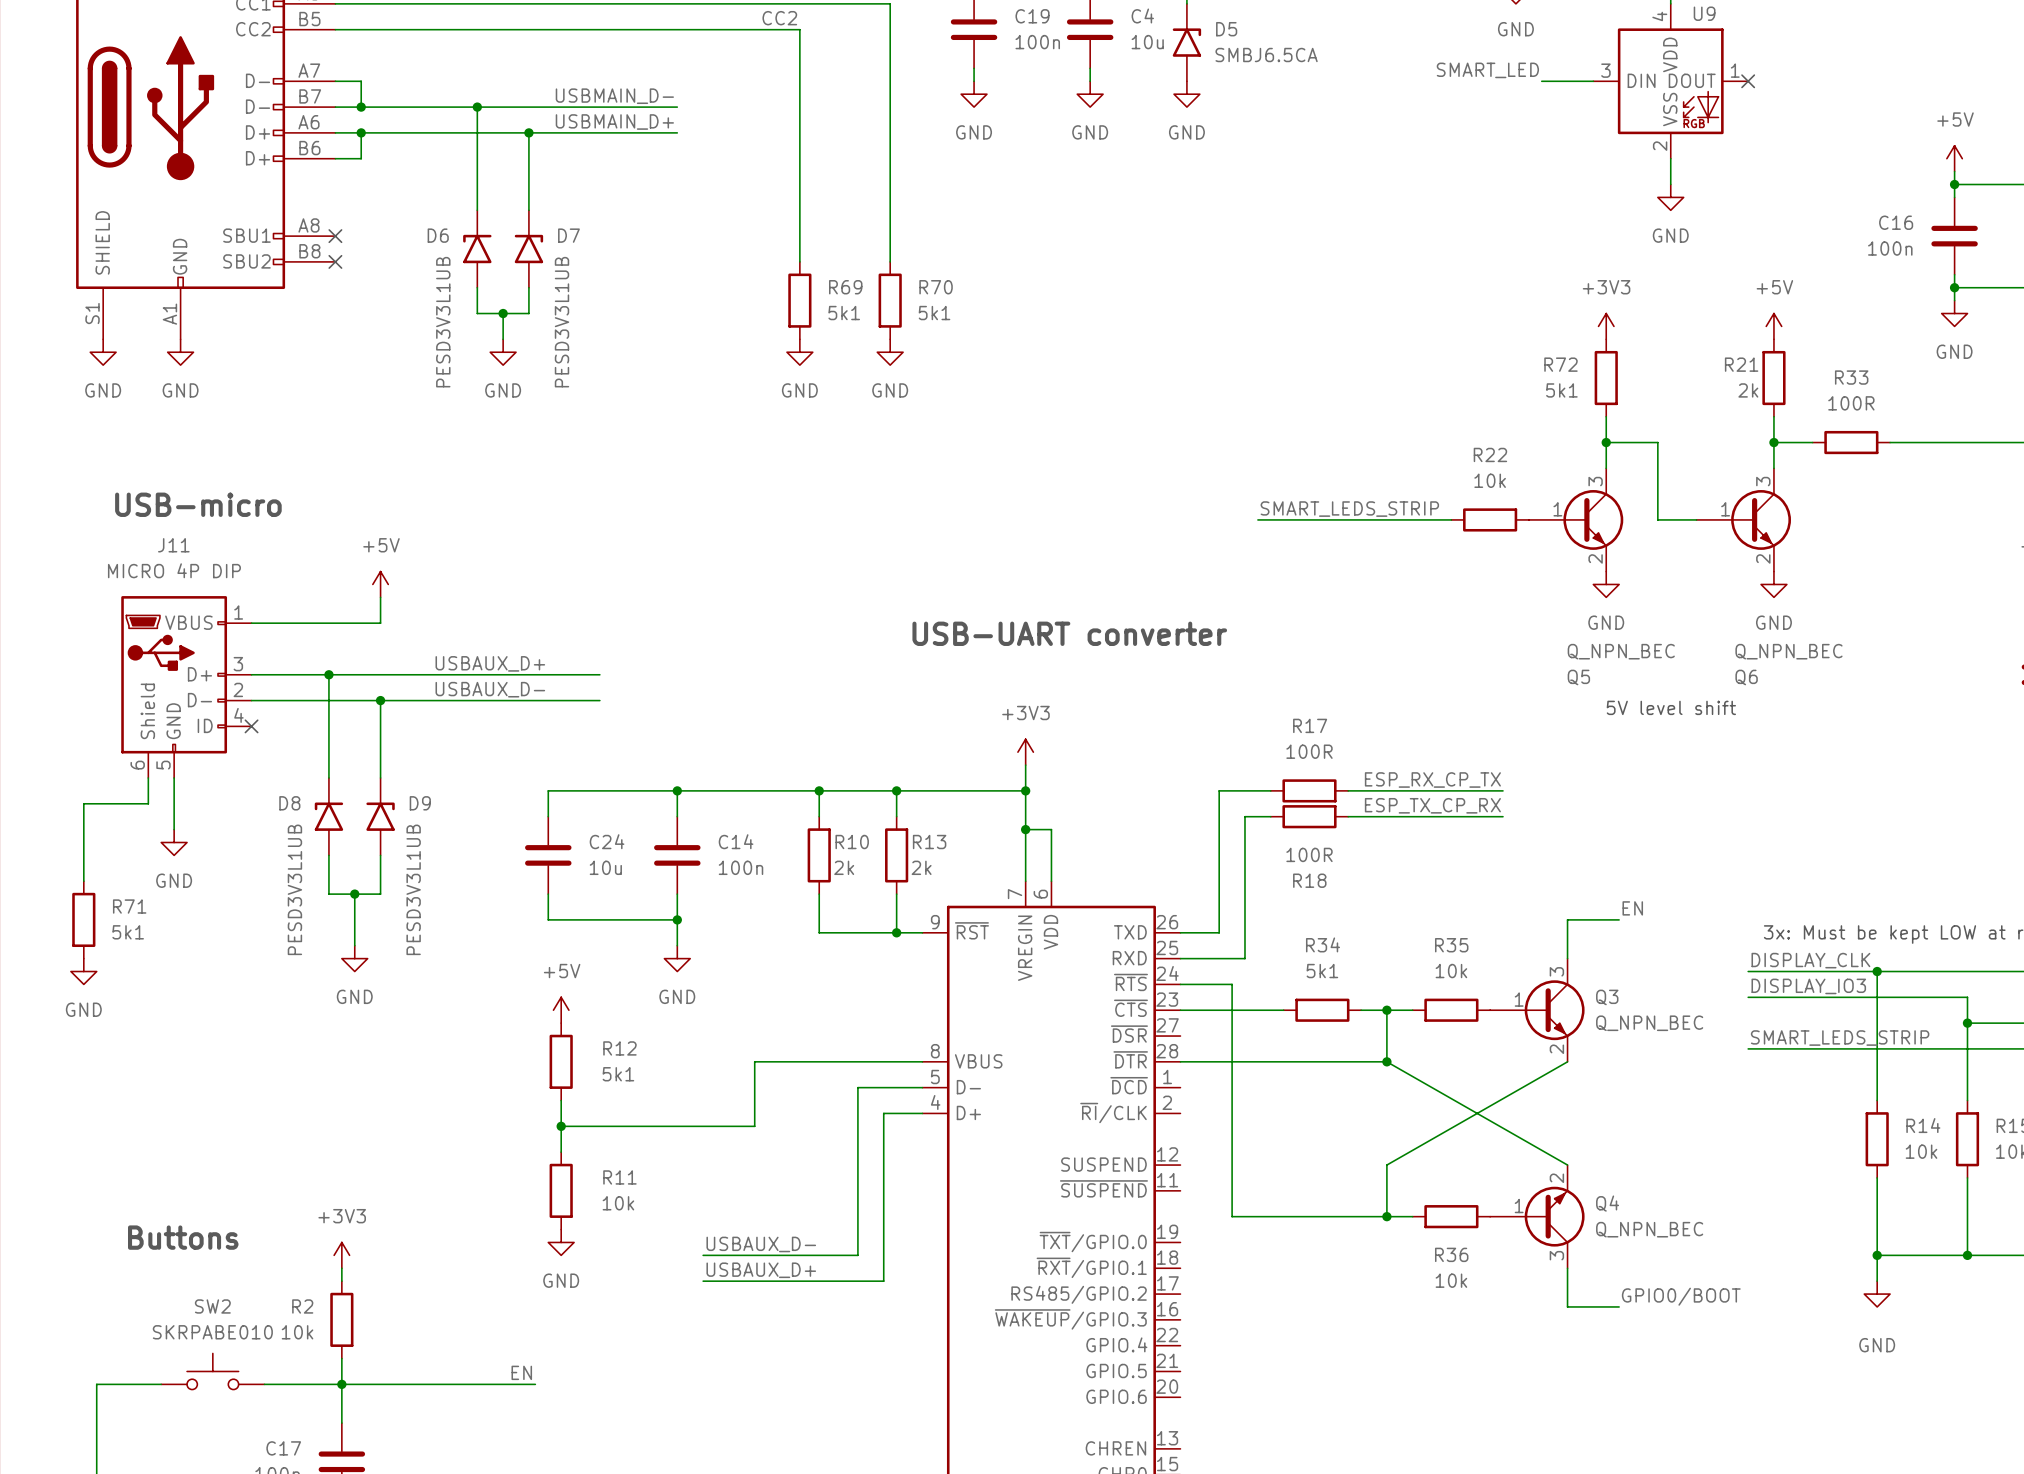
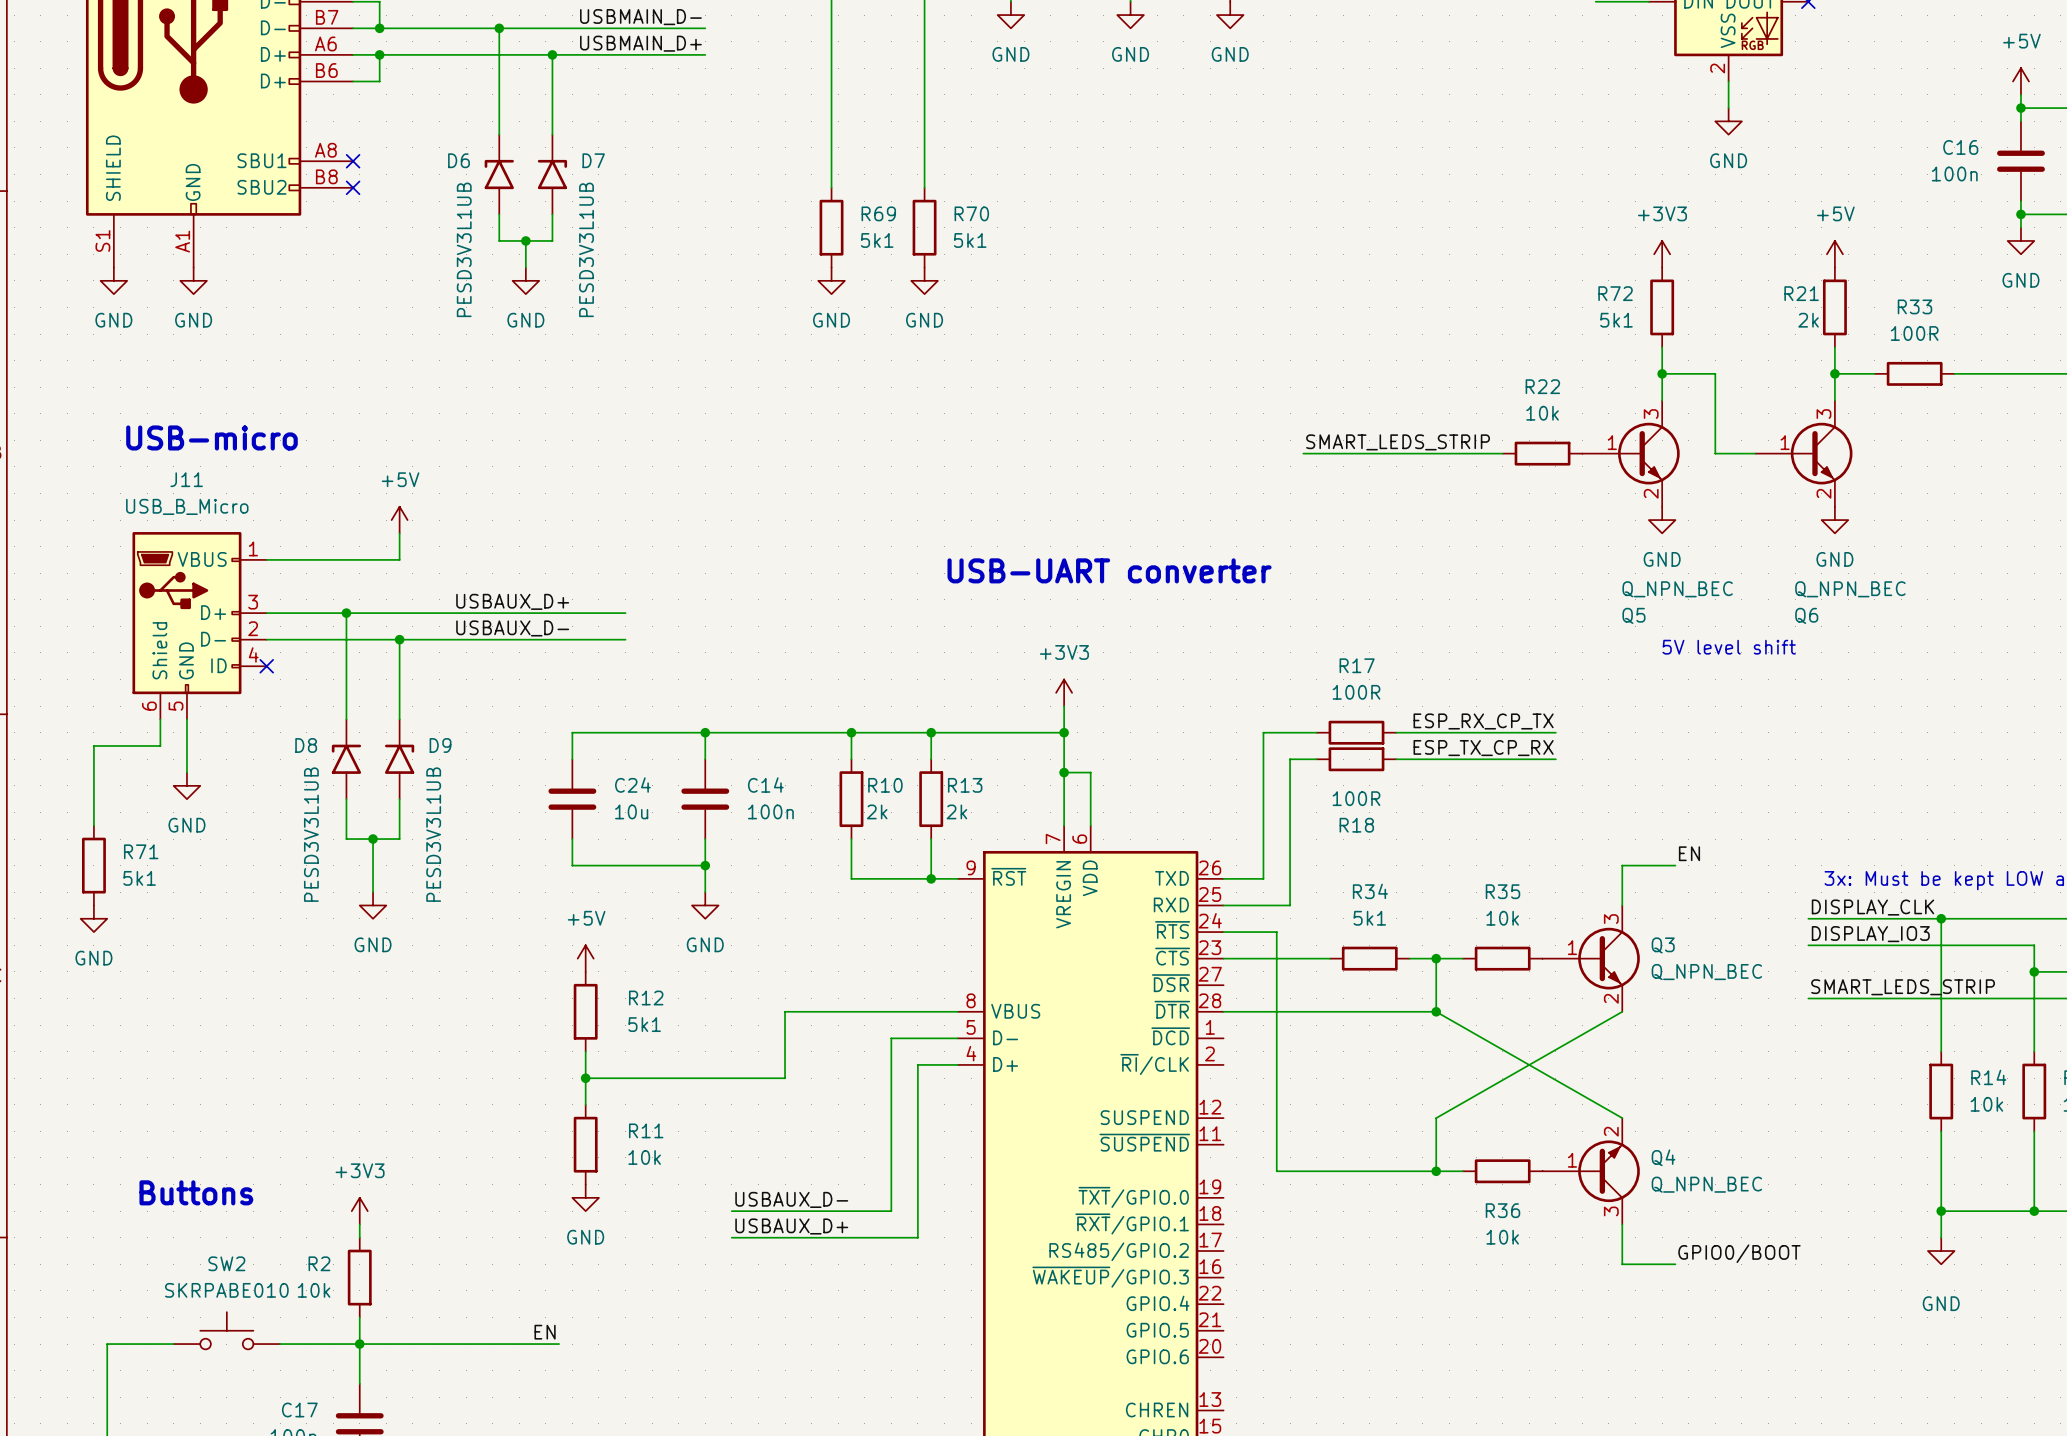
J11 value: MICRO 4P DIP (174, 570) -> USB_B_Micro (187, 506)

